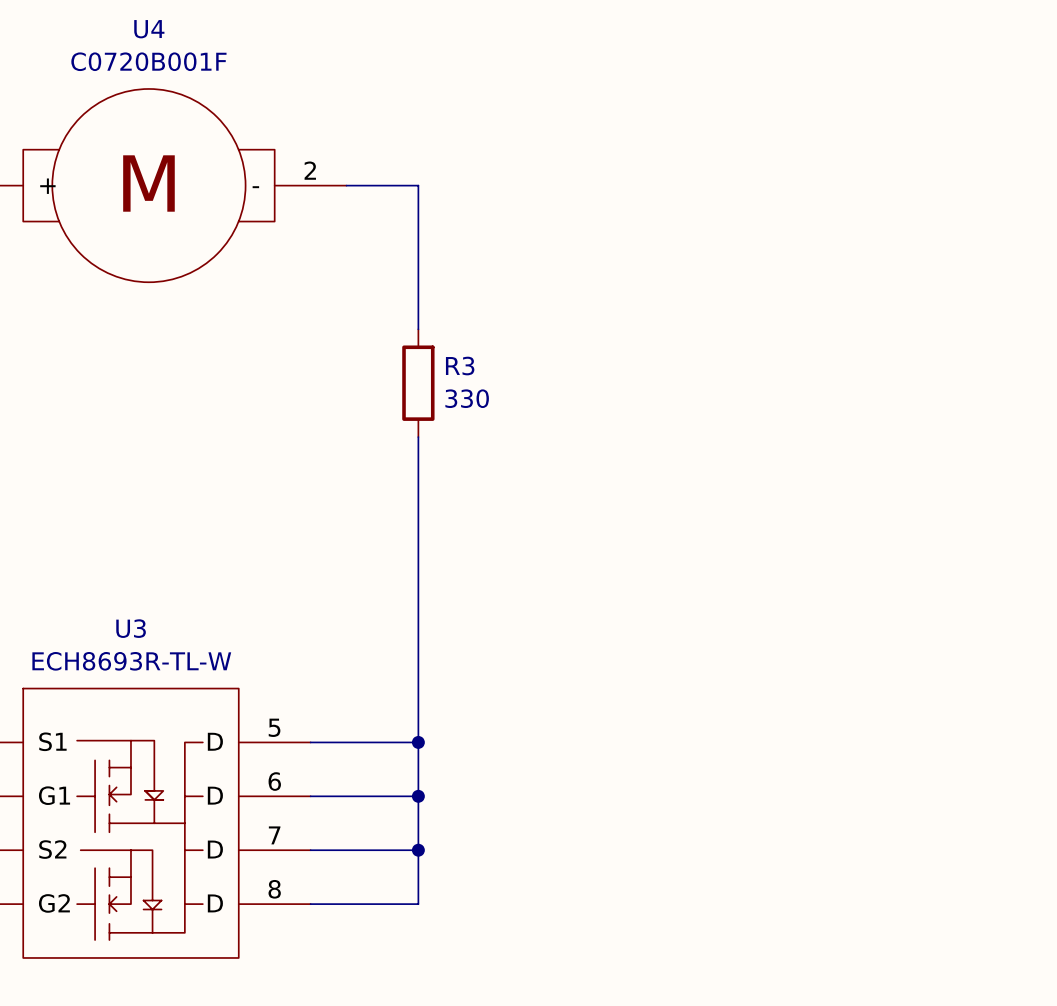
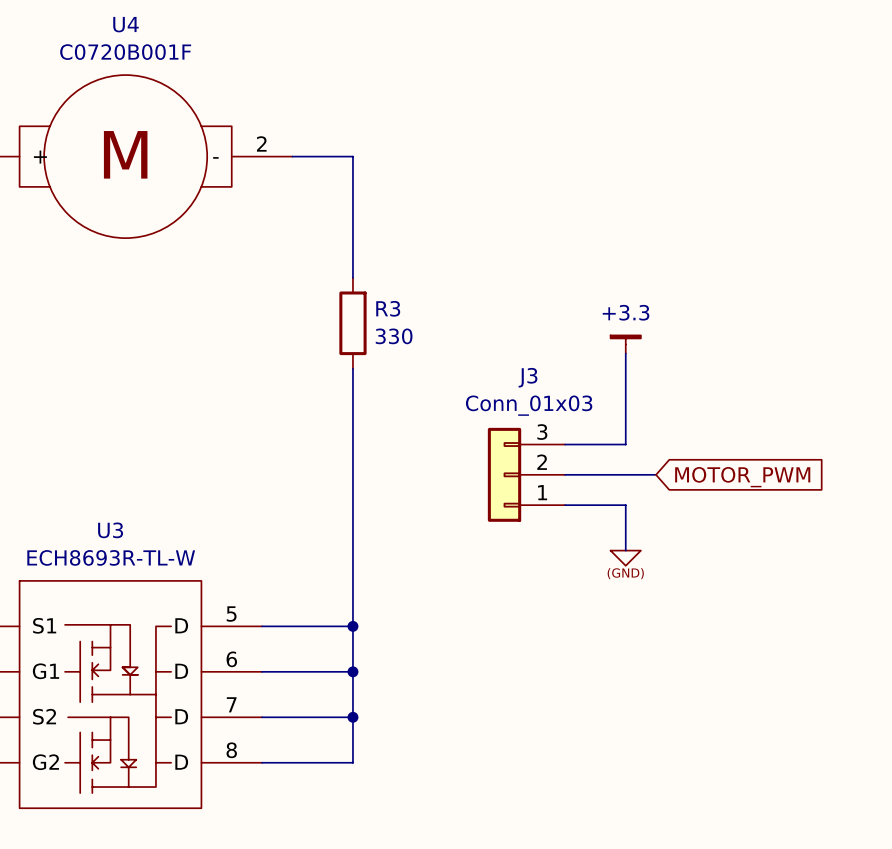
power symbol: none -> +3.3 (625, 344)
wire: none -> (625, 353) (625, 444) (565, 444)
J3: none -> Conn_01x03 (526, 474)
wire: none -> (565, 474) (656, 474)
global label: none -> MOTOR_PWM (742, 477)
wire: none -> (565, 505) (625, 505) (625, 550)
power symbol: none -> (625, 558)

